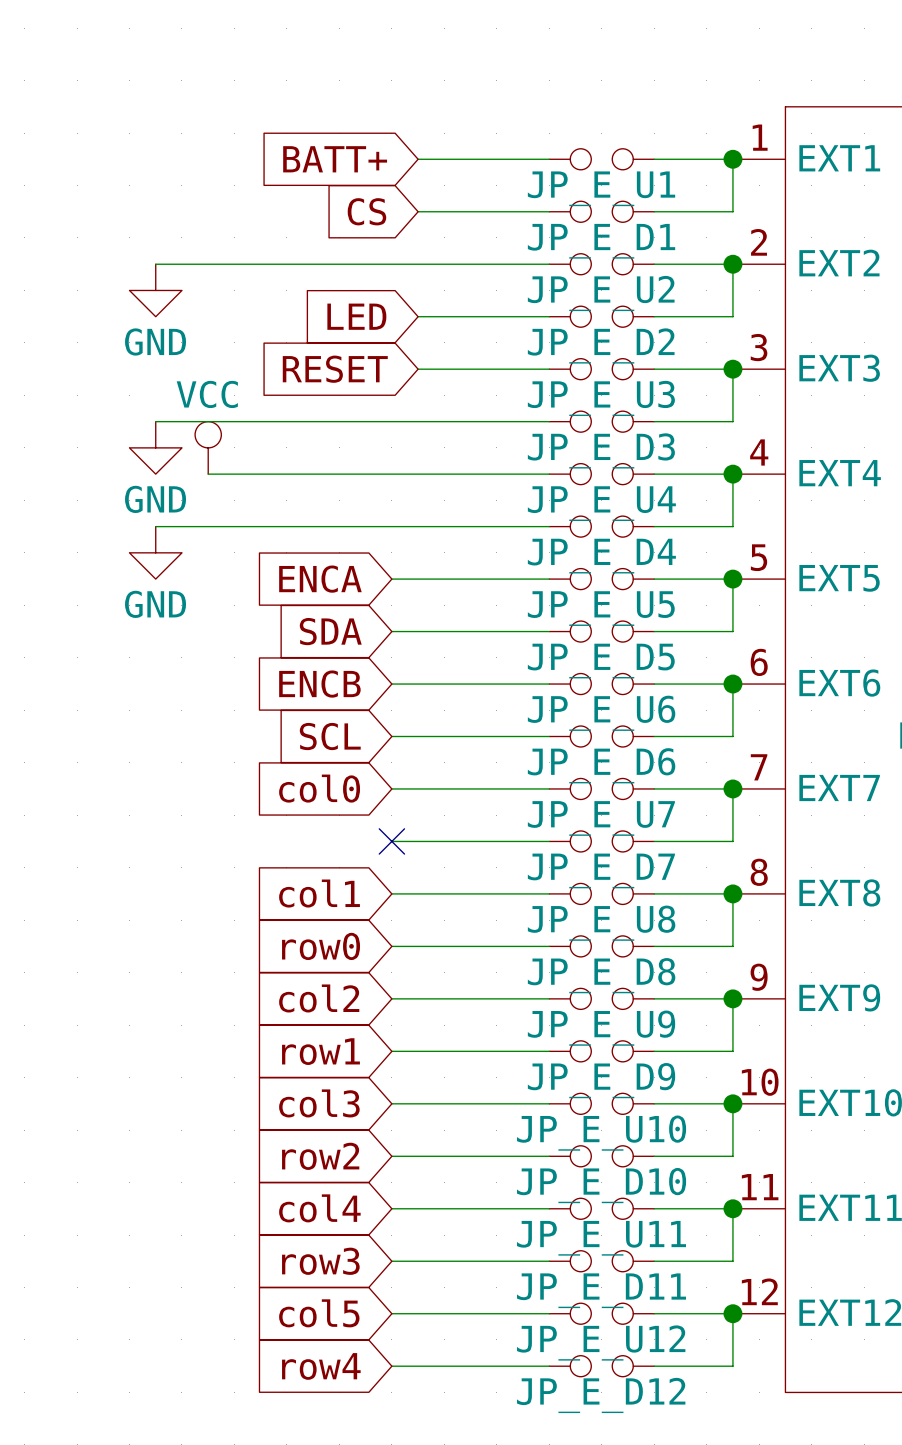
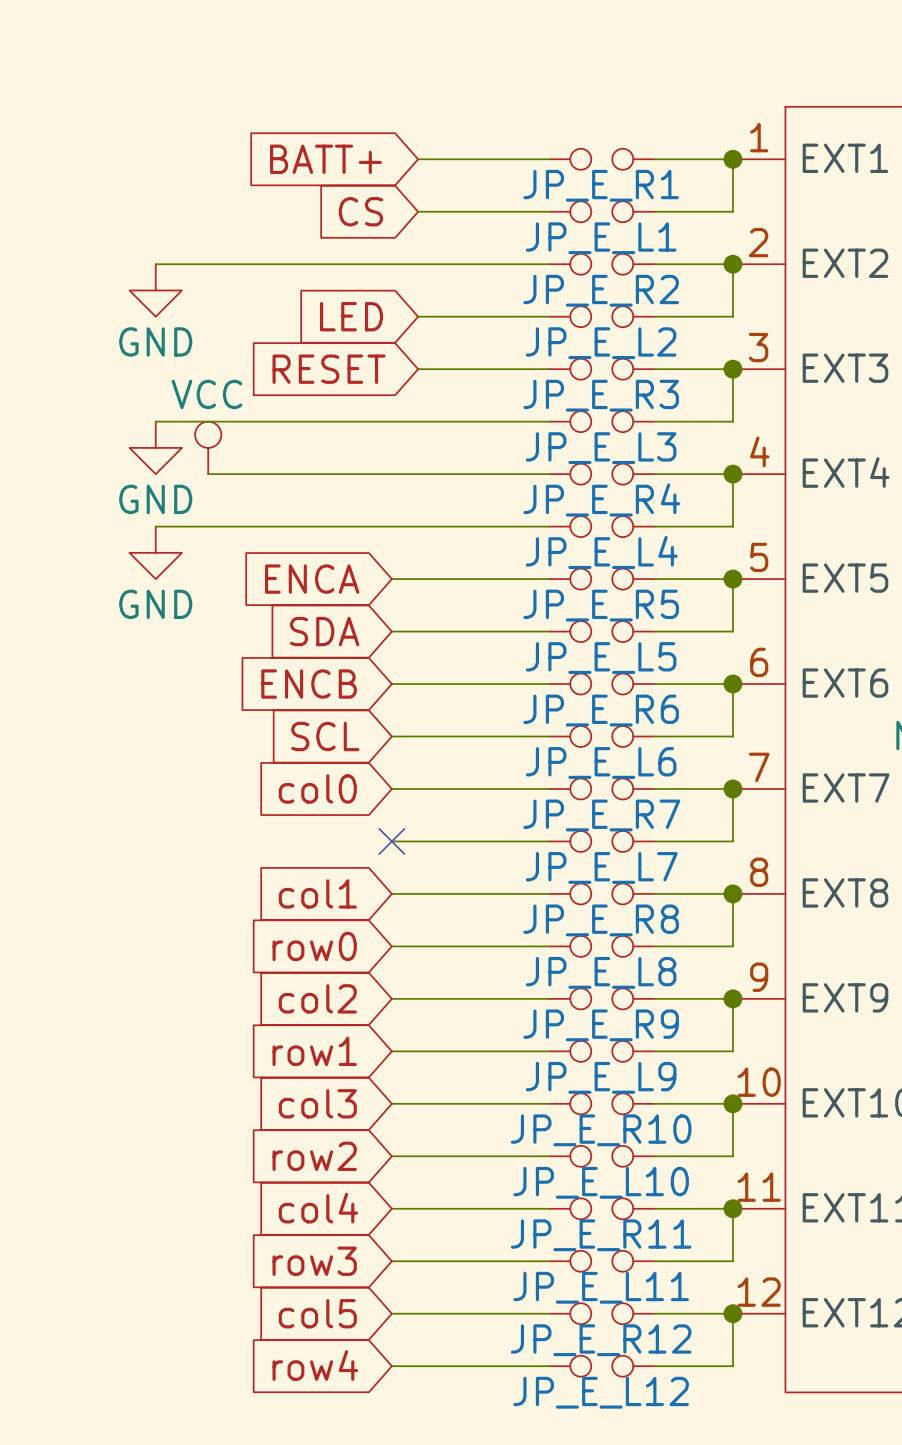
JP_E_U1 name: JP_E_U1 (601, 188) -> JP_E_R1 (601, 185)
JP_E_D1 name: JP_E_D1 (601, 241) -> JP_E_L1 (601, 238)
JP_E_U2 name: JP_E_U2 (601, 293) -> JP_E_R2 (601, 290)
JP_E_D2 name: JP_E_D2 (601, 345) -> JP_E_L2 (601, 343)
JP_E_U3 name: JP_E_U3 (601, 398) -> JP_E_R3 (601, 395)
JP_E_D3 name: JP_E_D3 (601, 450) -> JP_E_L3 (601, 448)
JP_E_U4 name: JP_E_U4 (601, 503) -> JP_E_R4 (601, 500)
JP_E_D4 name: JP_E_D4 (601, 556) -> JP_E_L4 (601, 552)
JP_E_U5 name: JP_E_U5 (601, 608) -> JP_E_R5 (601, 605)
JP_E_D5 name: JP_E_D5 (601, 661) -> JP_E_L5 (601, 658)
JP_E_U6 name: JP_E_U6 (601, 713) -> JP_E_R6 (601, 710)
JP_E_D6 name: JP_E_D6 (601, 765) -> JP_E_L6 (601, 763)
JP_E_U7 name: JP_E_U7 (601, 818) -> JP_E_R7 (601, 815)
JP_E_D7 name: JP_E_D7 (601, 870) -> JP_E_L7 (601, 867)
JP_E_U8 name: JP_E_U8 (601, 923) -> JP_E_R8 (601, 920)
JP_E_D8 name: JP_E_D8 (601, 975) -> JP_E_L8 (601, 972)
JP_E_U9 name: JP_E_U9 (601, 1028) -> JP_E_R9 (601, 1025)
JP_E_D9 name: JP_E_D9 (601, 1080) -> JP_E_L9 (601, 1077)
JP_E_U10 name: JP_E_U10 (601, 1133) -> JP_E_R10 (601, 1130)
JP_E_D10 name: JP_E_D10 (601, 1185) -> JP_E_L10 (601, 1182)
JP_E_U11 name: JP_E_U11 (601, 1238) -> JP_E_R11 (601, 1235)
JP_E_D11 name: JP_E_D11 (601, 1290) -> JP_E_L11 (601, 1287)
JP_E_U12 name: JP_E_U12 (601, 1342) -> JP_E_R12 (601, 1340)
JP_E_D12 name: JP_E_D12 (601, 1395) -> JP_E_L12 (601, 1392)

